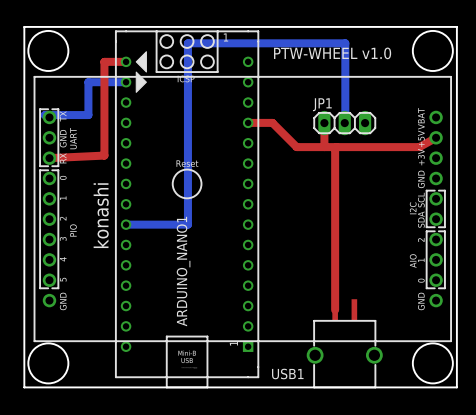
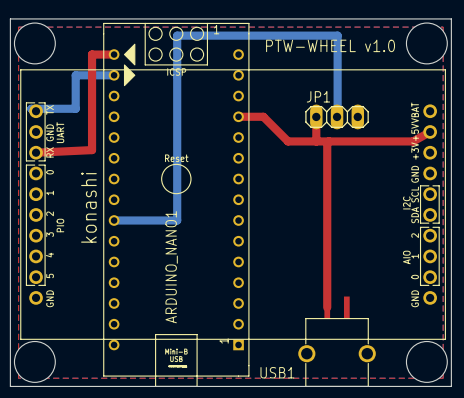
top zone outline: none -> (18, 27) (443, 27) (443, 378) (18, 378) (18, 27)

